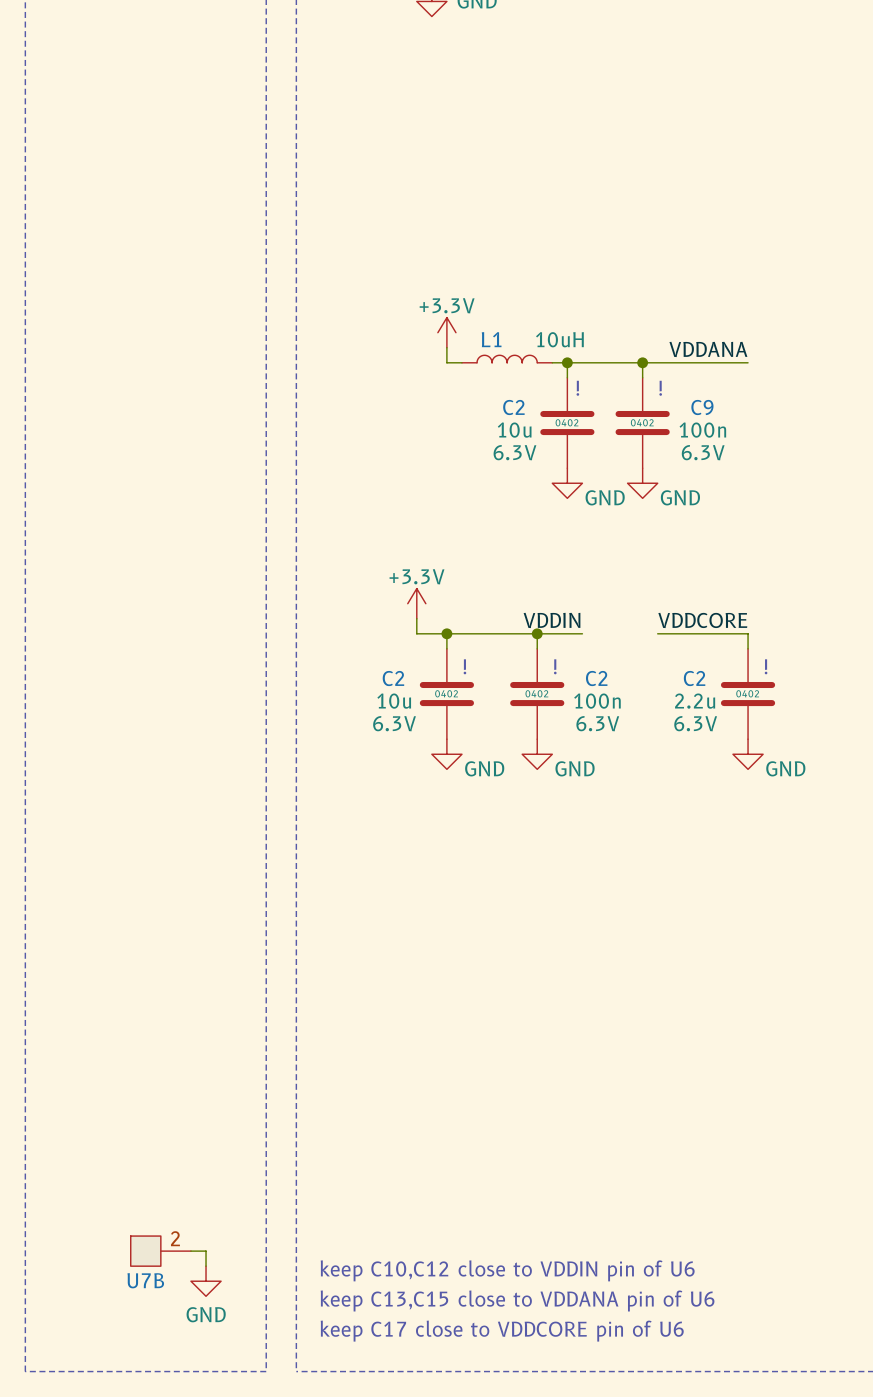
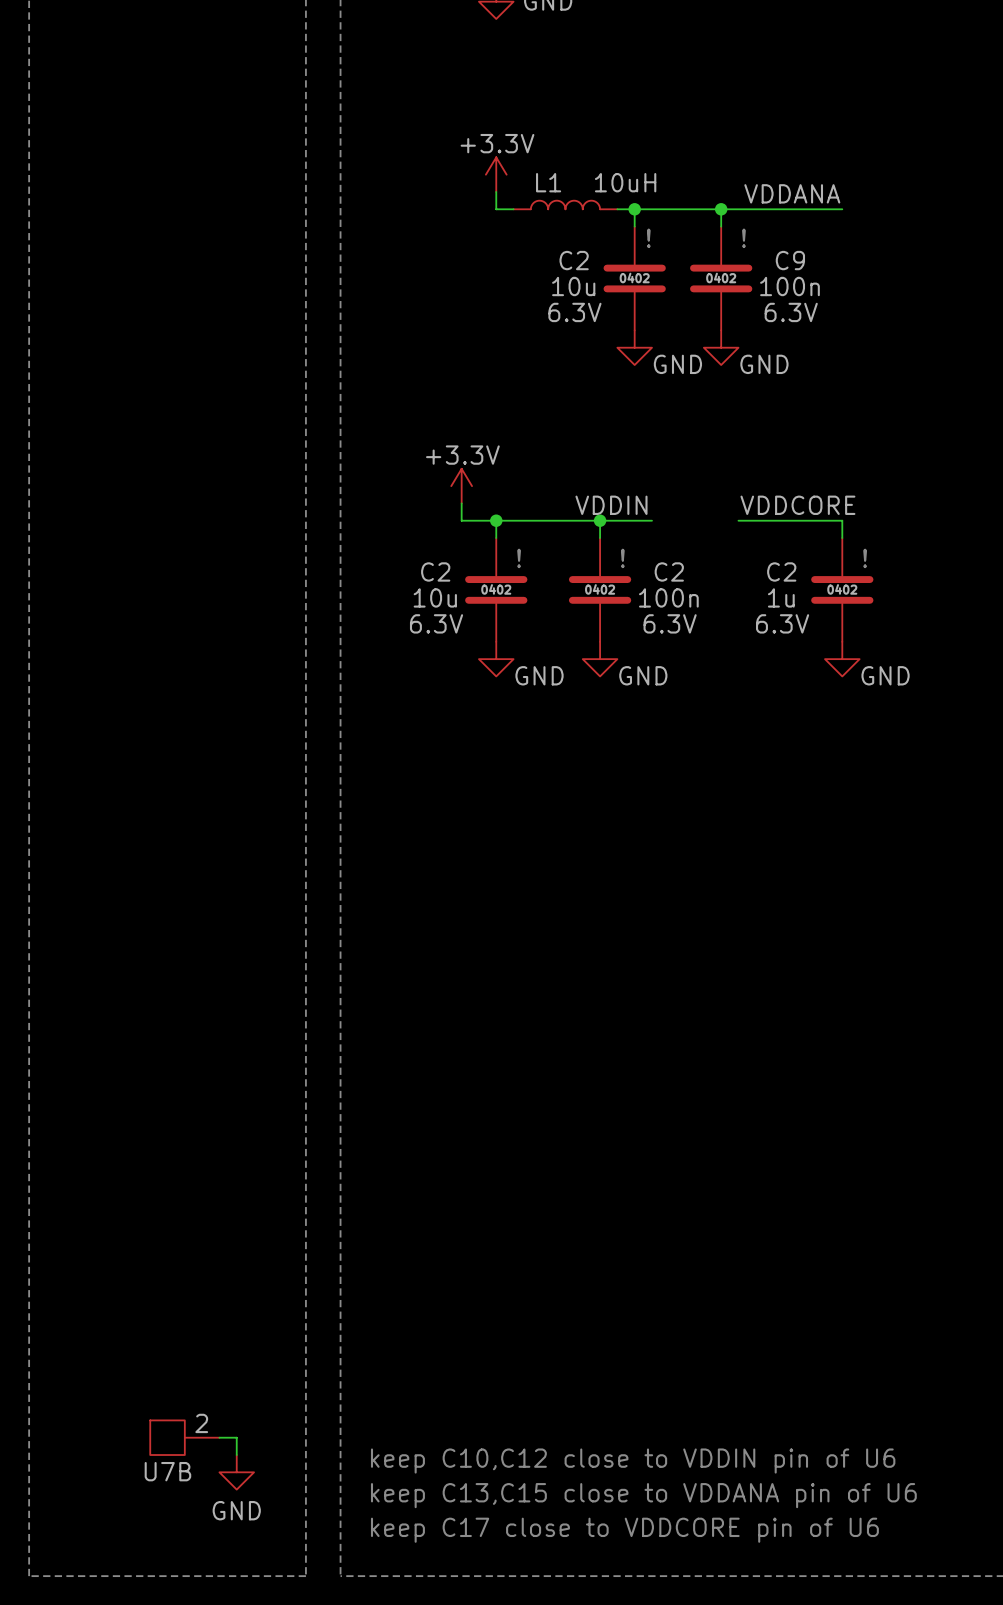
power symbol: none -> +3.3V (496, 174)
junction: none -> (634, 209)
junction: none -> (721, 209)
text: none -> ! (648, 238)
text: none -> ! (743, 238)
C2: none -> 10u (634, 278)
power symbol: none -> GND (634, 347)
power symbol: none -> GND (721, 347)
power symbol: +3.3V (446, 332) -> none
wire: (446, 347) (446, 362) (461, 362) -> (496, 191) (496, 209) (513, 209)
label position: VDDANA (708, 349) -> VDDANA (792, 193)
L1 position: (507, 359) -> (565, 204)
wire: (552, 362) (748, 362) -> (617, 209) (842, 209)
wire: (567, 362) (567, 377) -> (634, 209) (634, 226)
junction: (567, 362) -> none
wire: (642, 362) (642, 377) -> (721, 209) (721, 226)
junction: (642, 362) -> none
text: ! (577, 388) -> none
text: ! (660, 388) -> none
power symbol: none -> +3.3V (461, 486)
C2: 10u (567, 423) -> none
C9 position: (642, 423) -> (721, 278)
junction: none -> (496, 520)
junction: none -> (600, 520)
power symbol: GND (567, 483) -> none
power symbol: GND (642, 483) -> none
text: none -> ! (519, 558)
text: none -> ! (622, 558)
text: none -> ! (865, 558)
C2: none -> 10u (496, 589)
C2: none -> 1u (842, 589)
power symbol: none -> GND (496, 659)
power symbol: none -> GND (600, 659)
power symbol: none -> GND (842, 659)
power symbol: +3.3V (416, 603) -> none
wire: (416, 618) (416, 633) (582, 633) -> (461, 503) (461, 520) (651, 520)
label position: VDDIN (552, 620) -> VDDIN (611, 505)
label position: VDDCORE (702, 620) -> VDDCORE (797, 505)
wire: (446, 633) (446, 648) -> (496, 520) (496, 538)
junction: (446, 633) -> none
wire: (537, 633) (537, 648) -> (600, 520) (600, 538)
junction: (537, 633) -> none
wire: (657, 633) (748, 633) (748, 648) -> (738, 520) (842, 520) (842, 538)
text: ! (464, 666) -> none
text: ! (555, 666) -> none
text: ! (766, 666) -> none
C2: 10u (446, 694) -> none
C2 position: (537, 694) -> (600, 589)
C2: 2.2u (748, 694) -> none
power symbol: GND (446, 754) -> none
power symbol: GND (537, 754) -> none
power symbol: GND (748, 754) -> none

